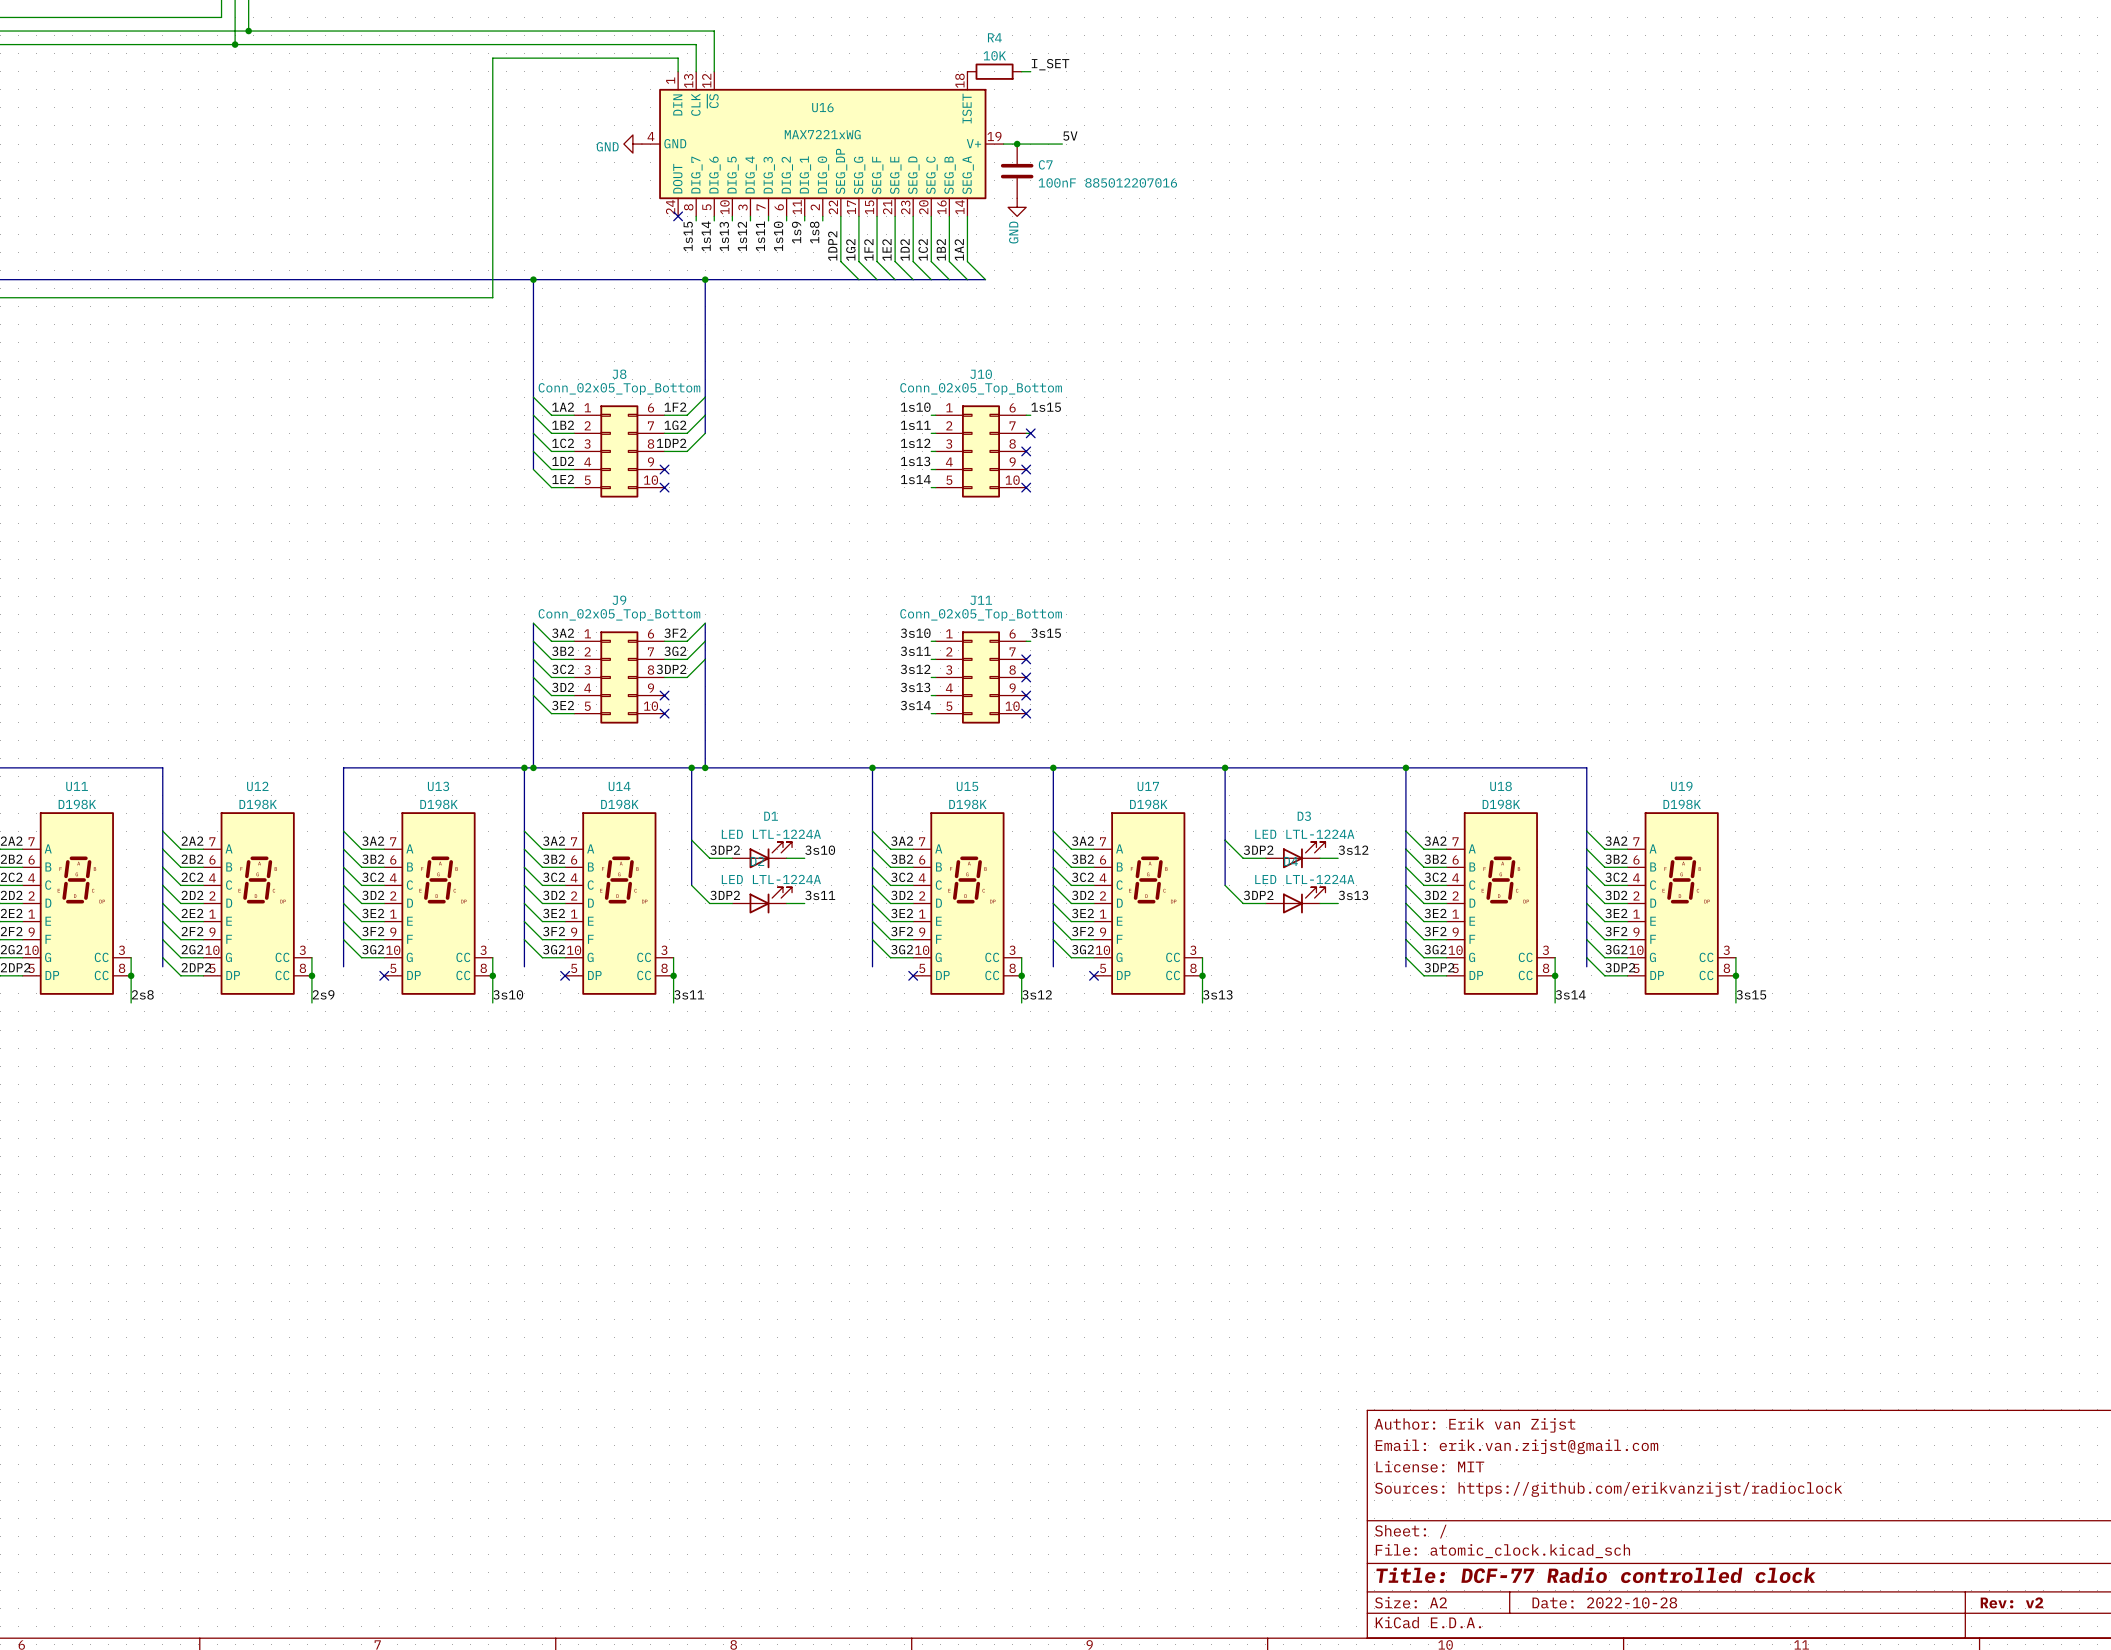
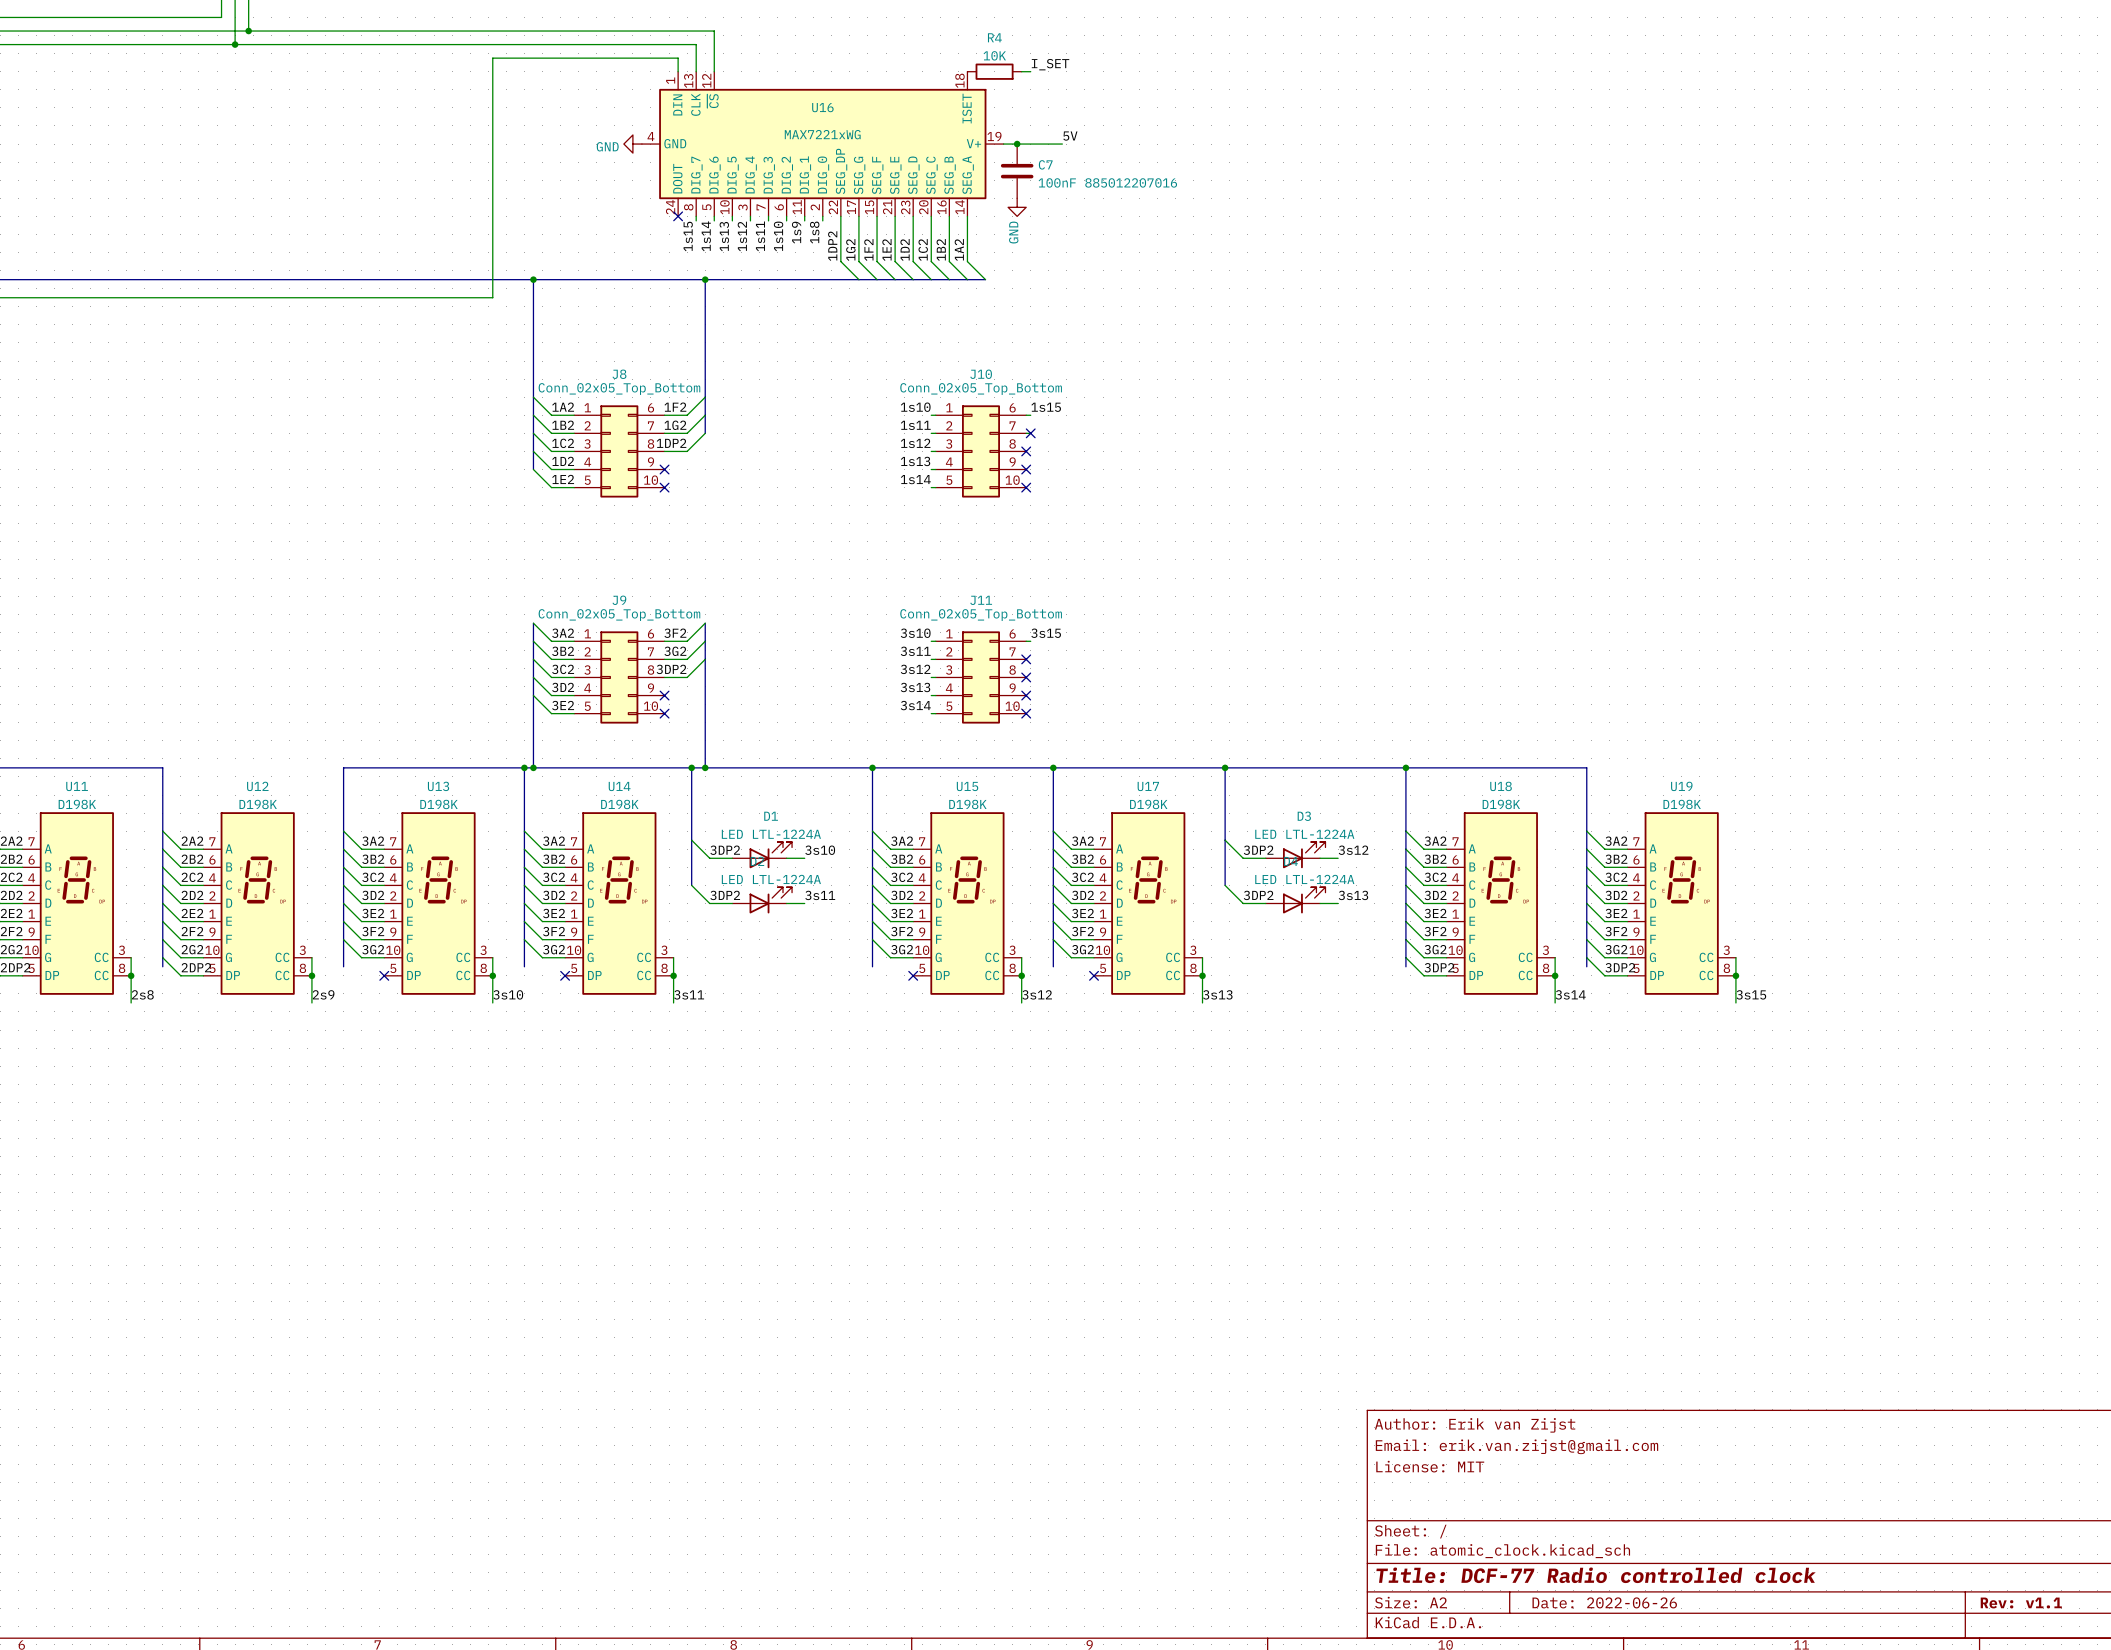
title block: Sources: https://github.com/erikvanzijst/radioclock (1608, 1489) -> none
title block: Date: 2022-10-28 (1604, 1602) -> Date: 2022-06-26 (1604, 1602)
title block: Rev: v2 (2011, 1602) -> Rev: v1.1 (2021, 1602)

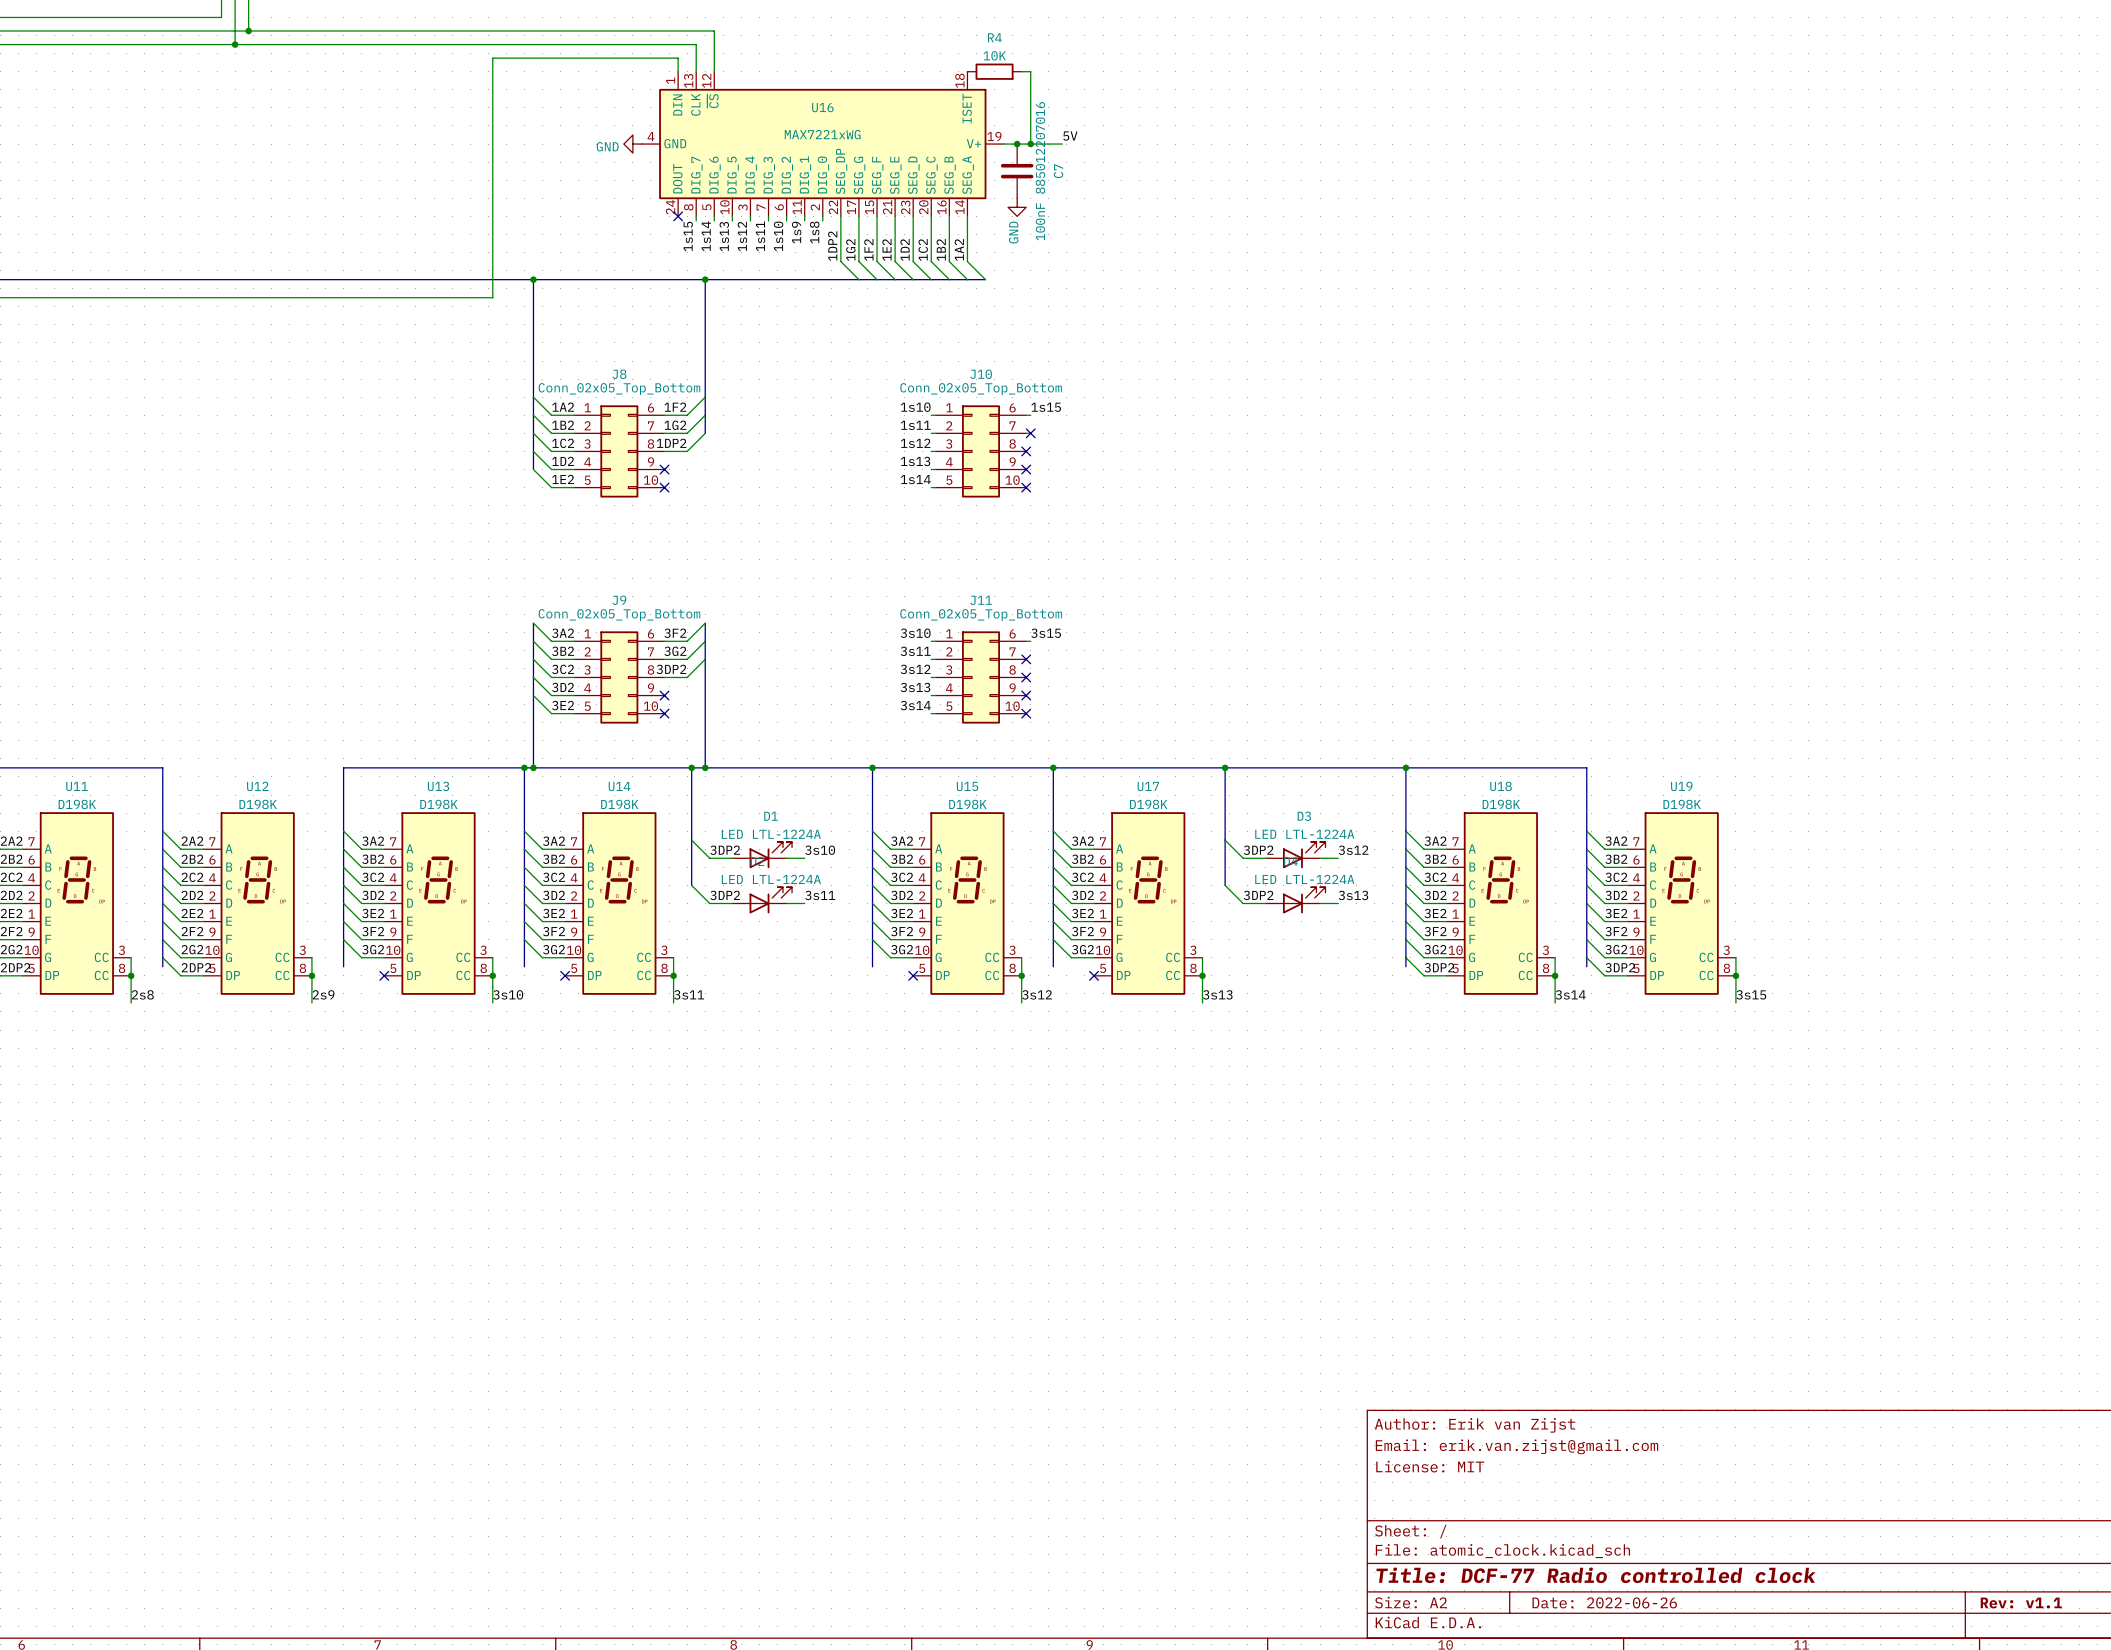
label: I_SET (1050, 64) -> none
wire: none -> (1030, 71) (1030, 144)
junction: none -> (1030, 144)
C7 name rotation: 0° (1045, 164) -> 90° counterclockwise (1058, 171)
C7 value rotation: 0° (1107, 182) -> 90° counterclockwise (1040, 171)

